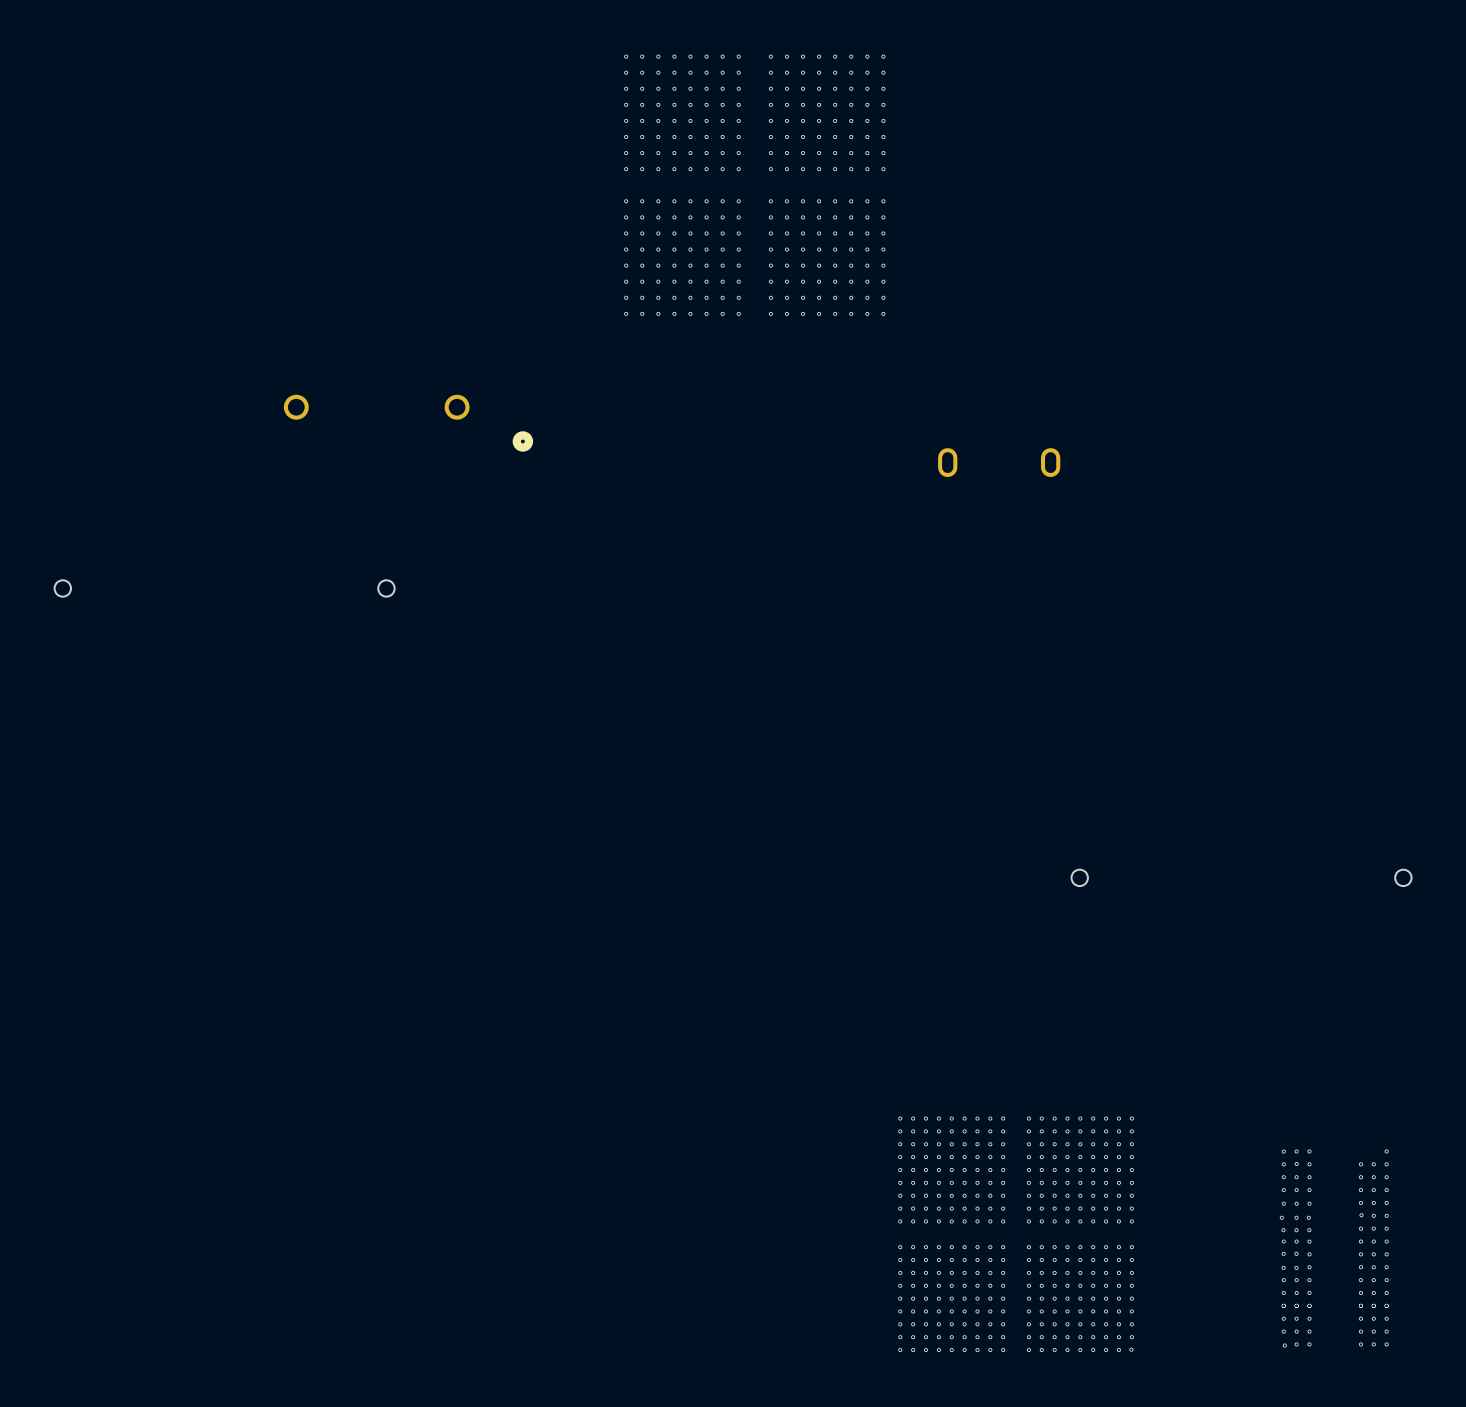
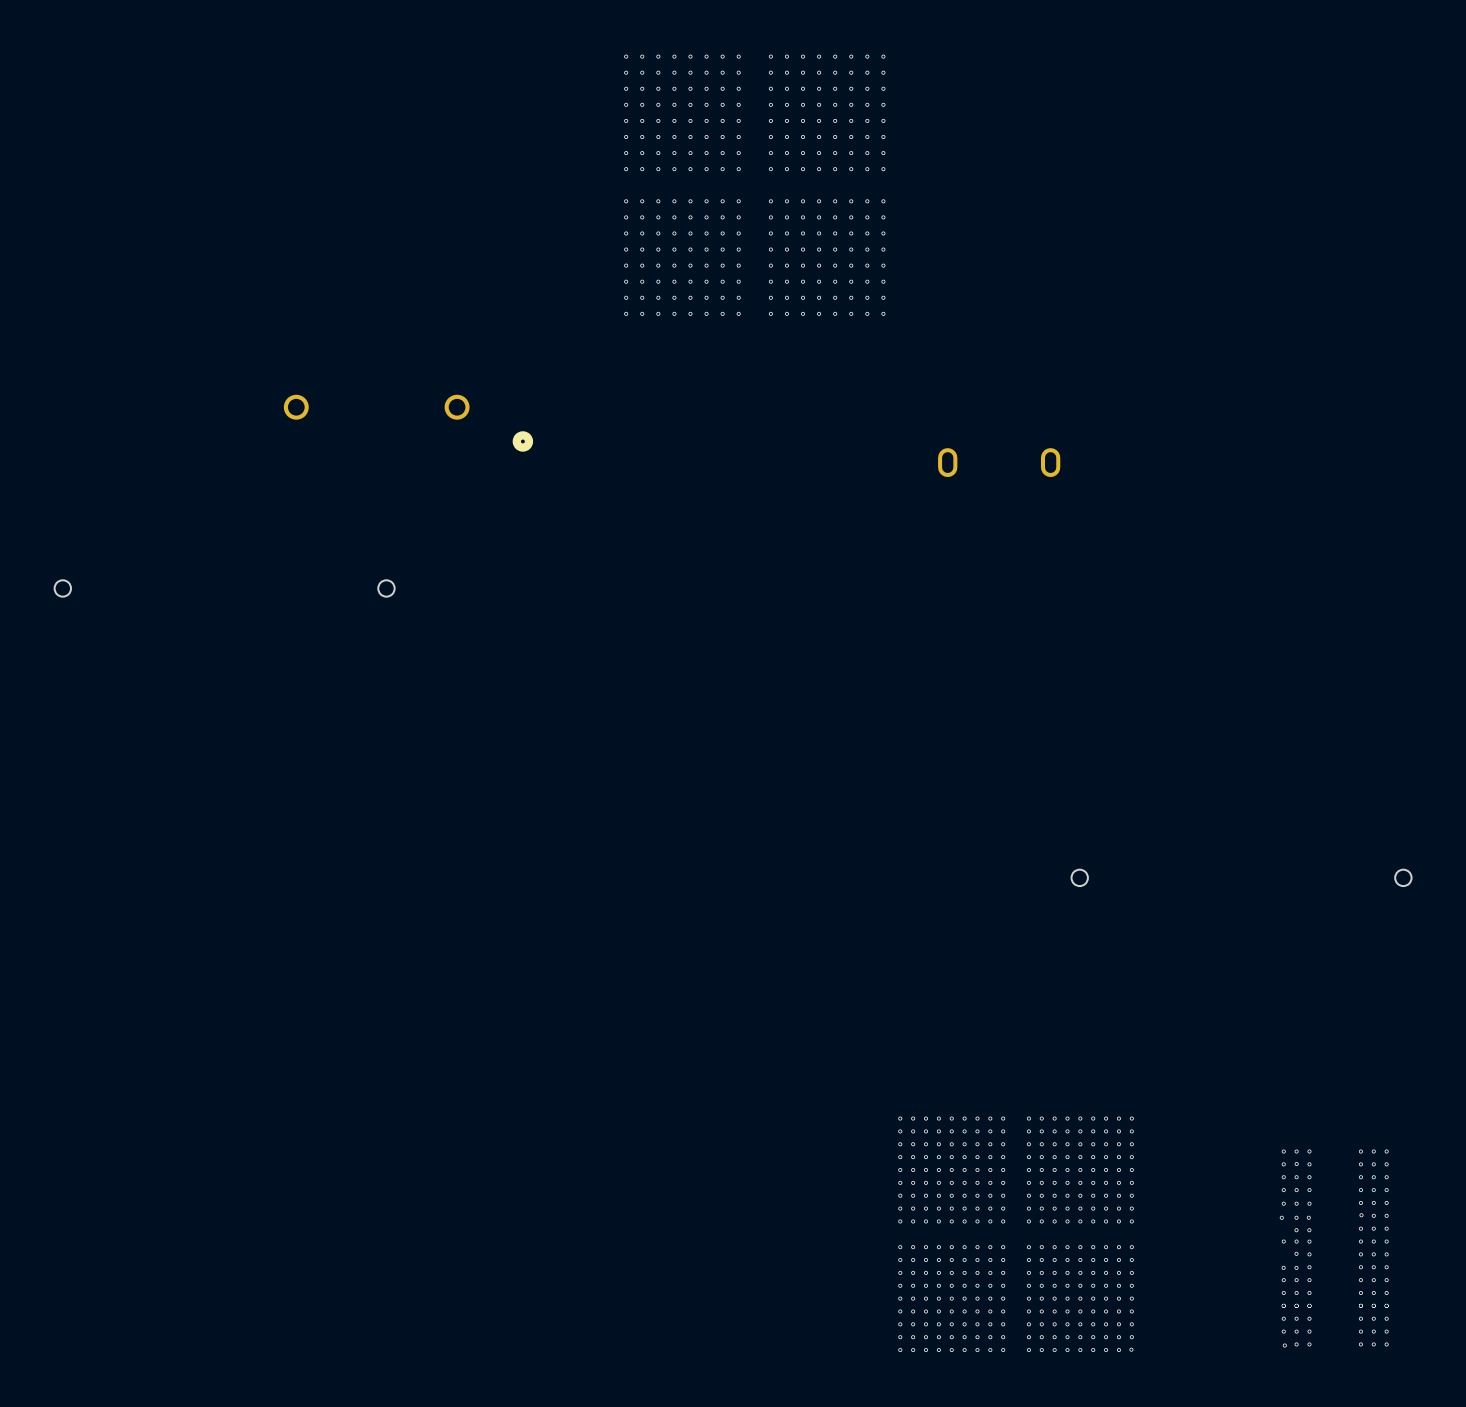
via: none -> (1360, 1151)
via: none -> (1373, 1151)
via: (1283, 1230) -> none
via: (1283, 1253) -> none

